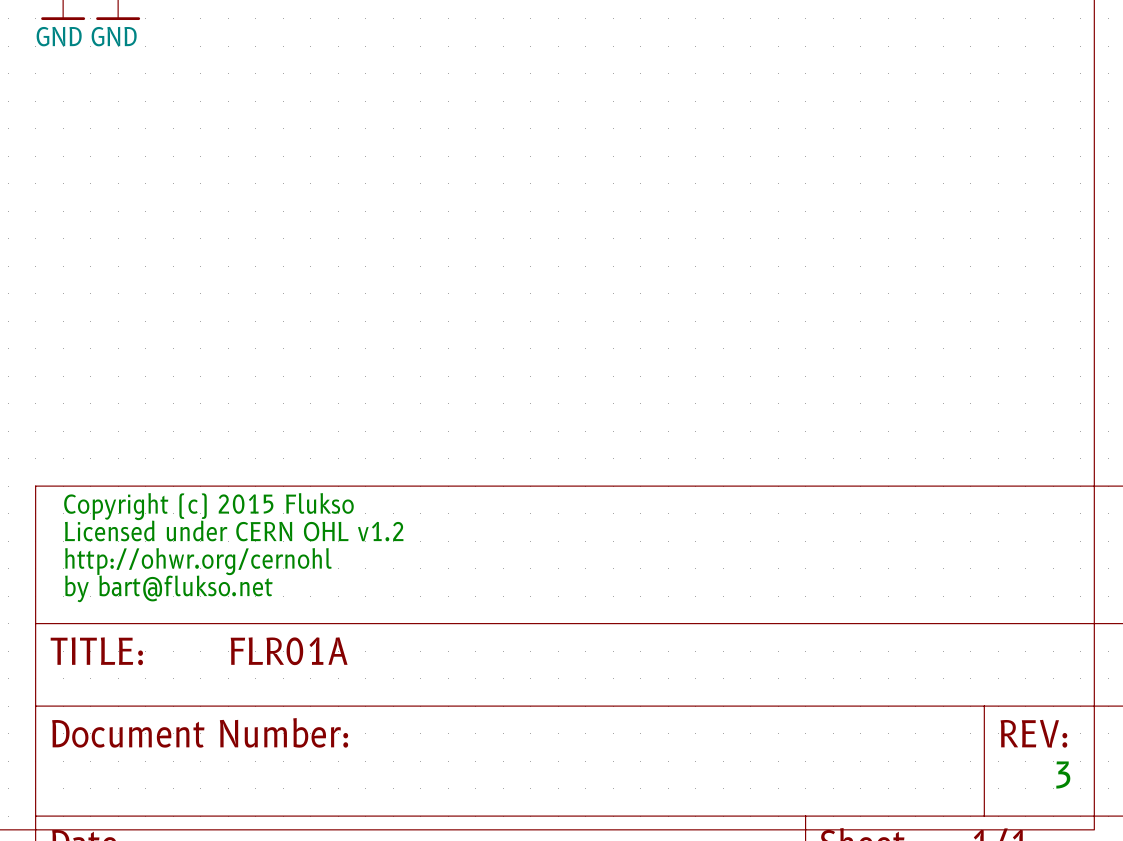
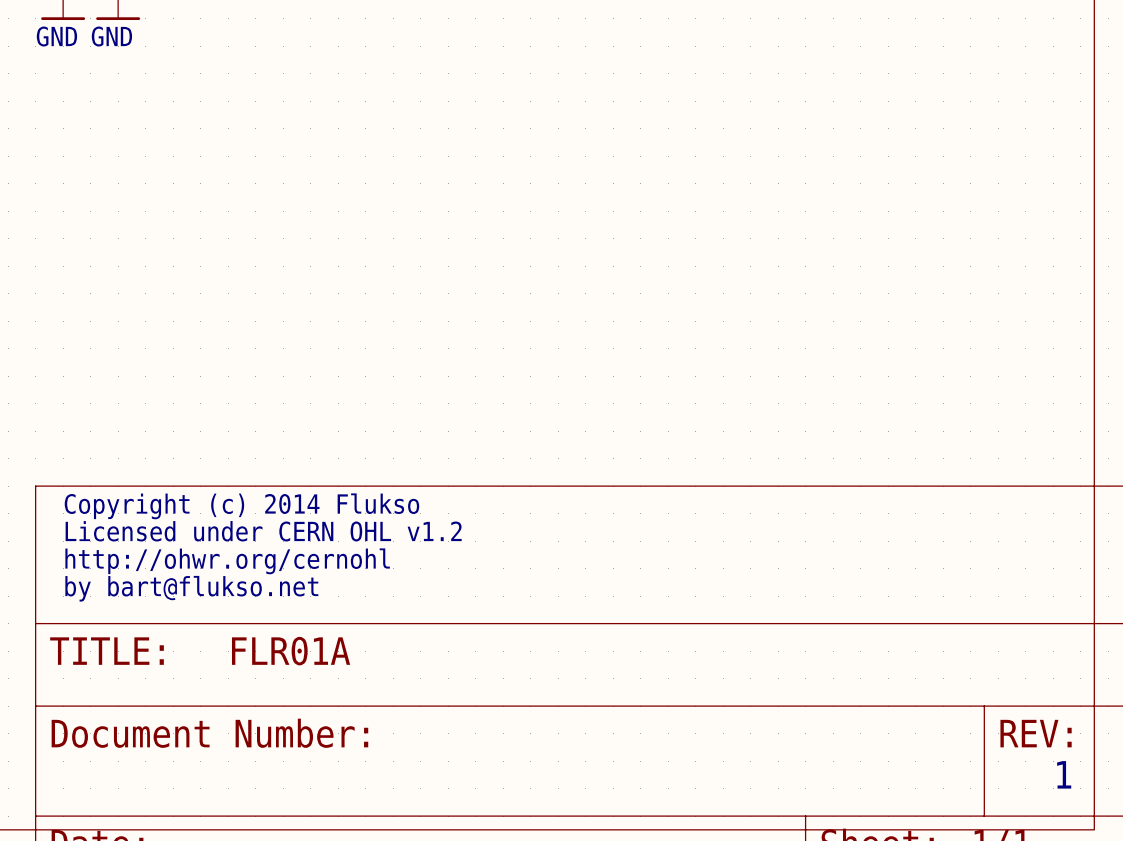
text: Copyright (c) 2015 Flukso (208, 506) -> Copyright (c) 2014 Flukso (241, 506)
text: 3 (1063, 775) -> 1 (1064, 774)

